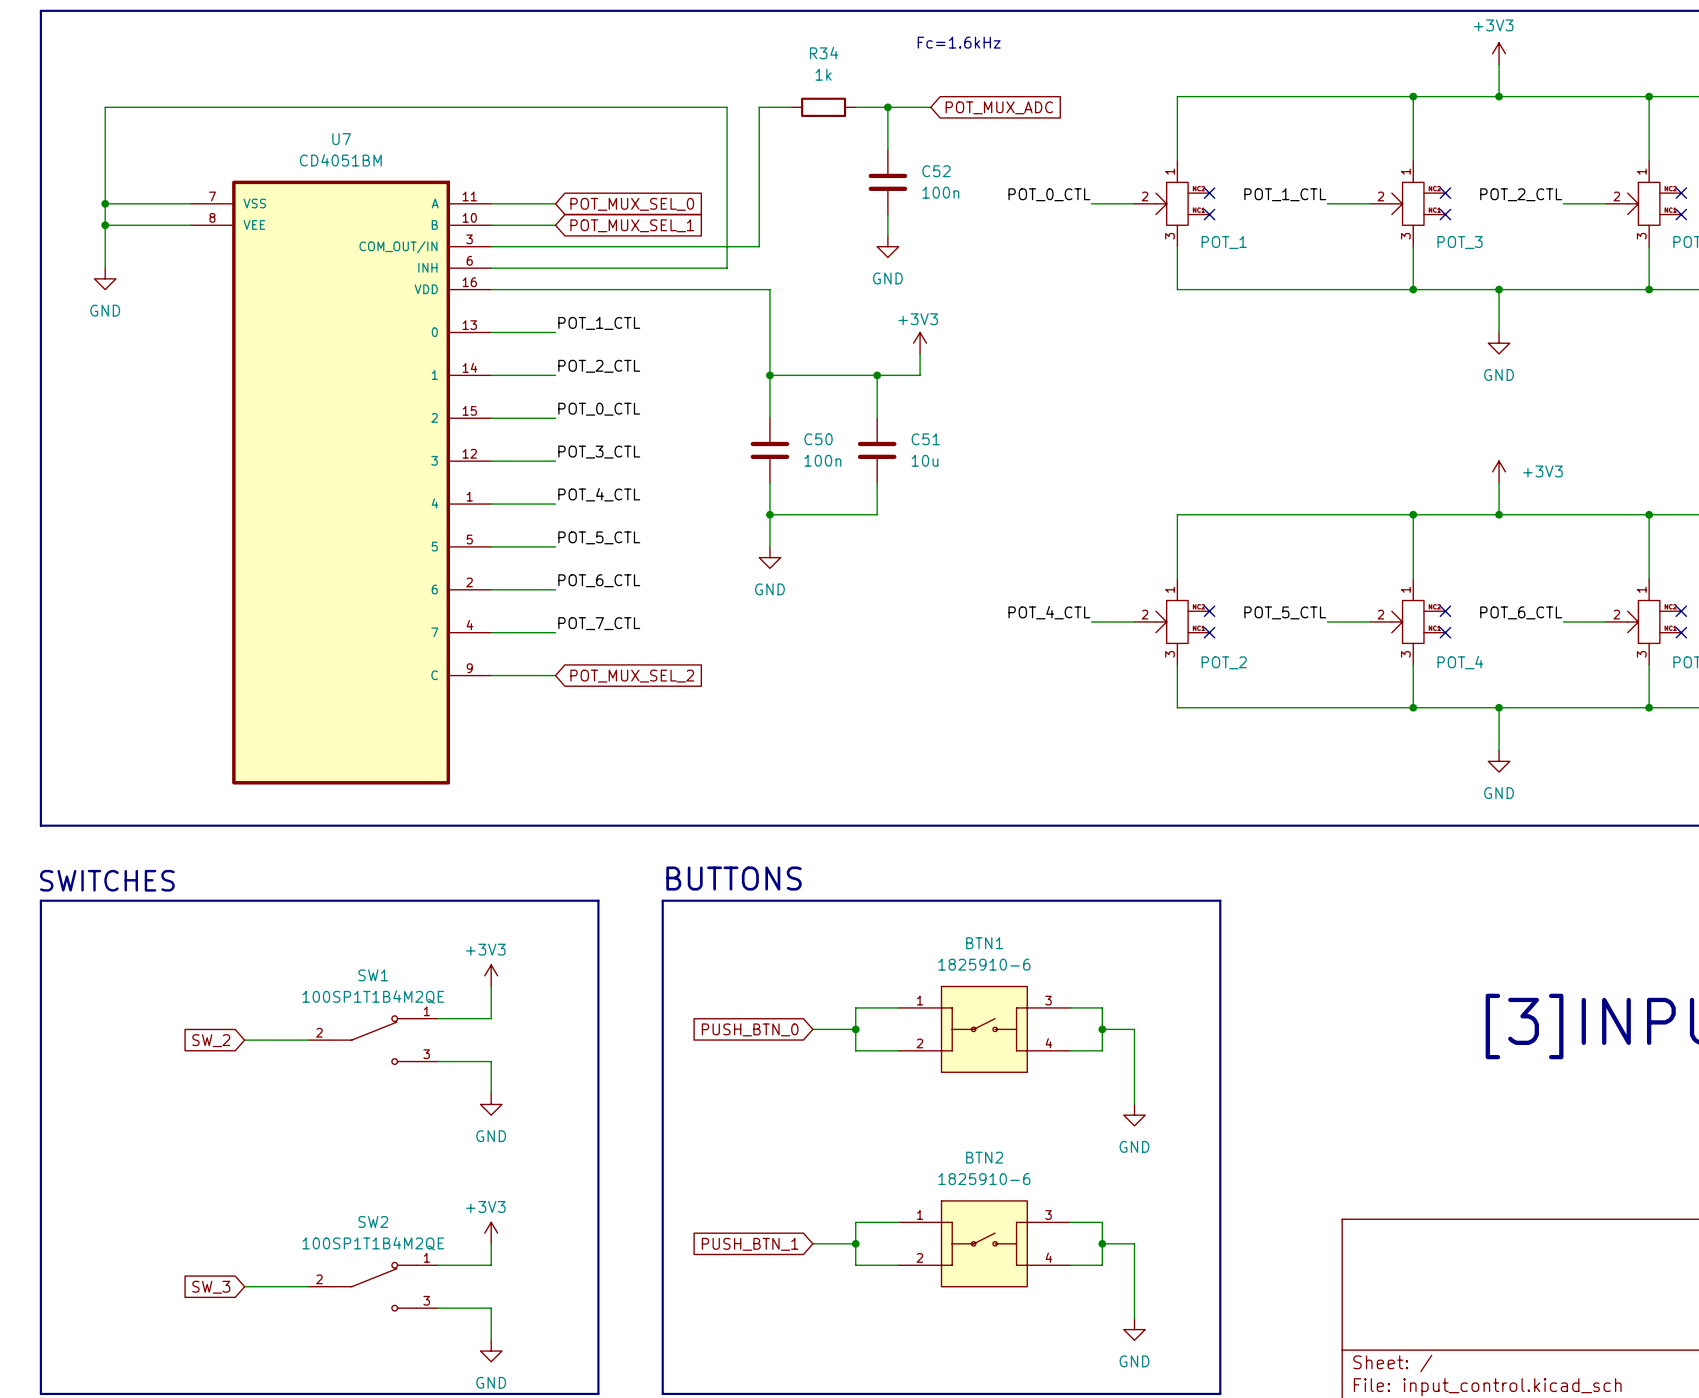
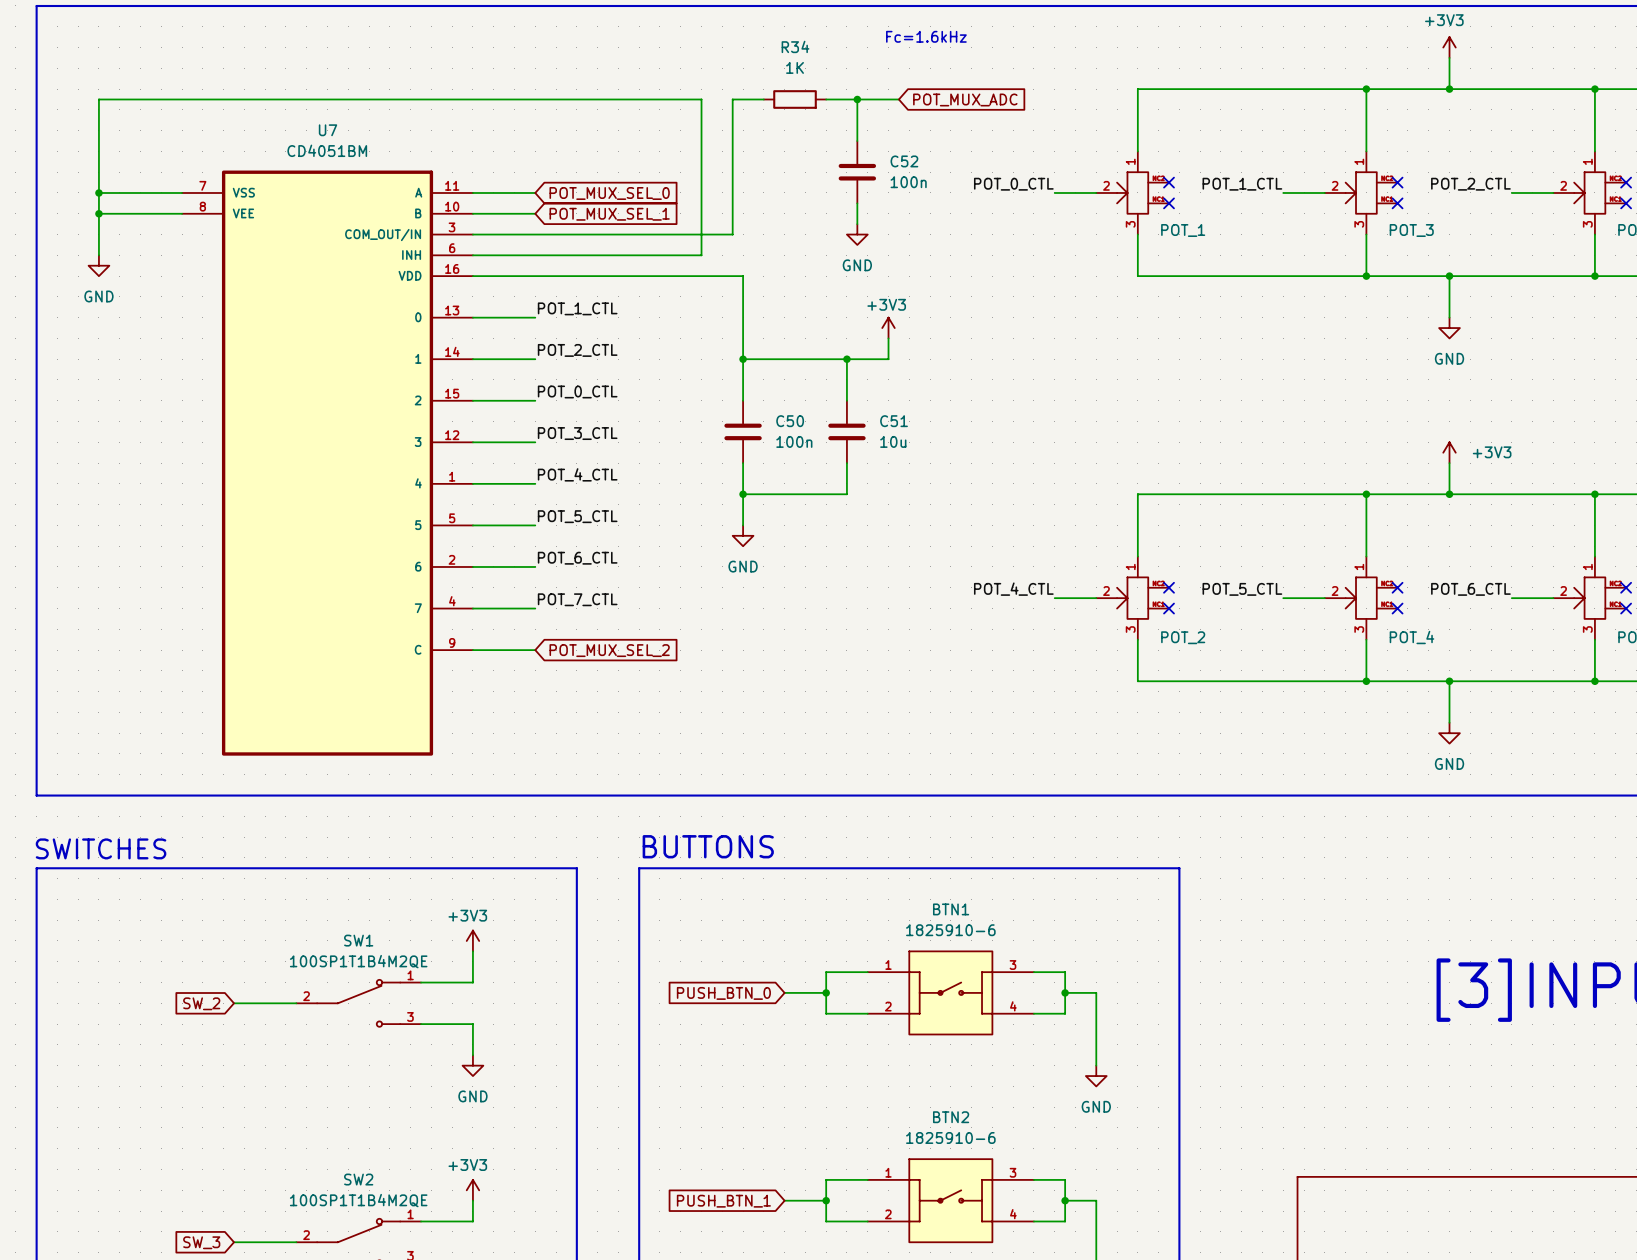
R34 value: 1k (823, 74) -> 1K (795, 67)

